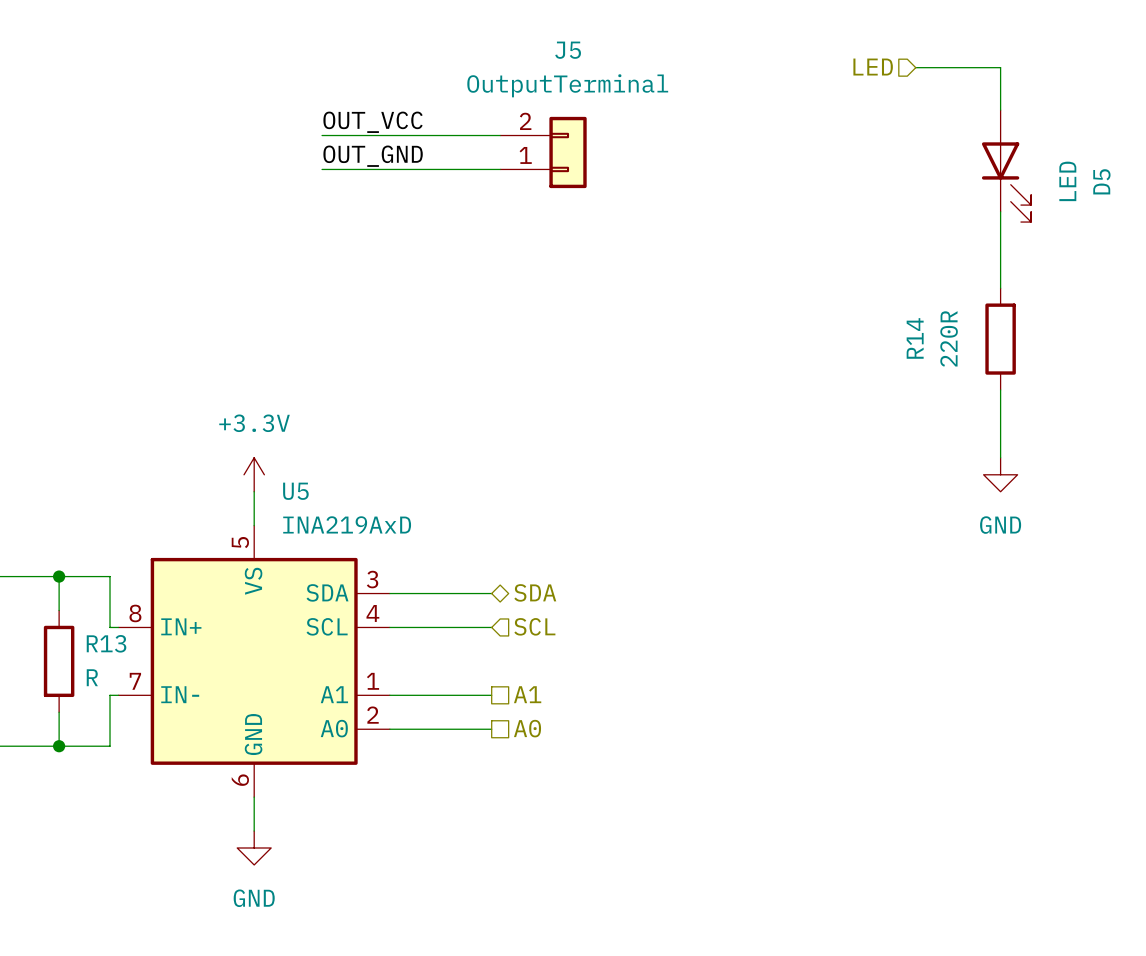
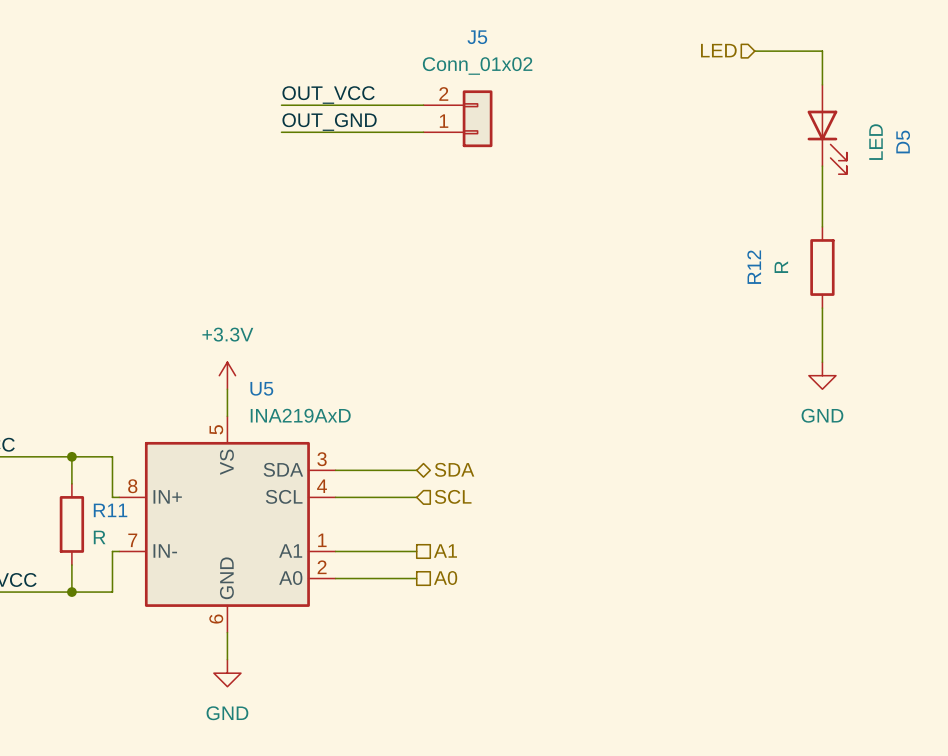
J5 value: OutputTerminal (567, 85) -> Conn_01x02 (477, 66)
R14 name: R14 (915, 338) -> R12 (754, 267)
R14 value: 220R (949, 338) -> R (781, 267)
R13 name: R13 (106, 643) -> R11 (110, 510)

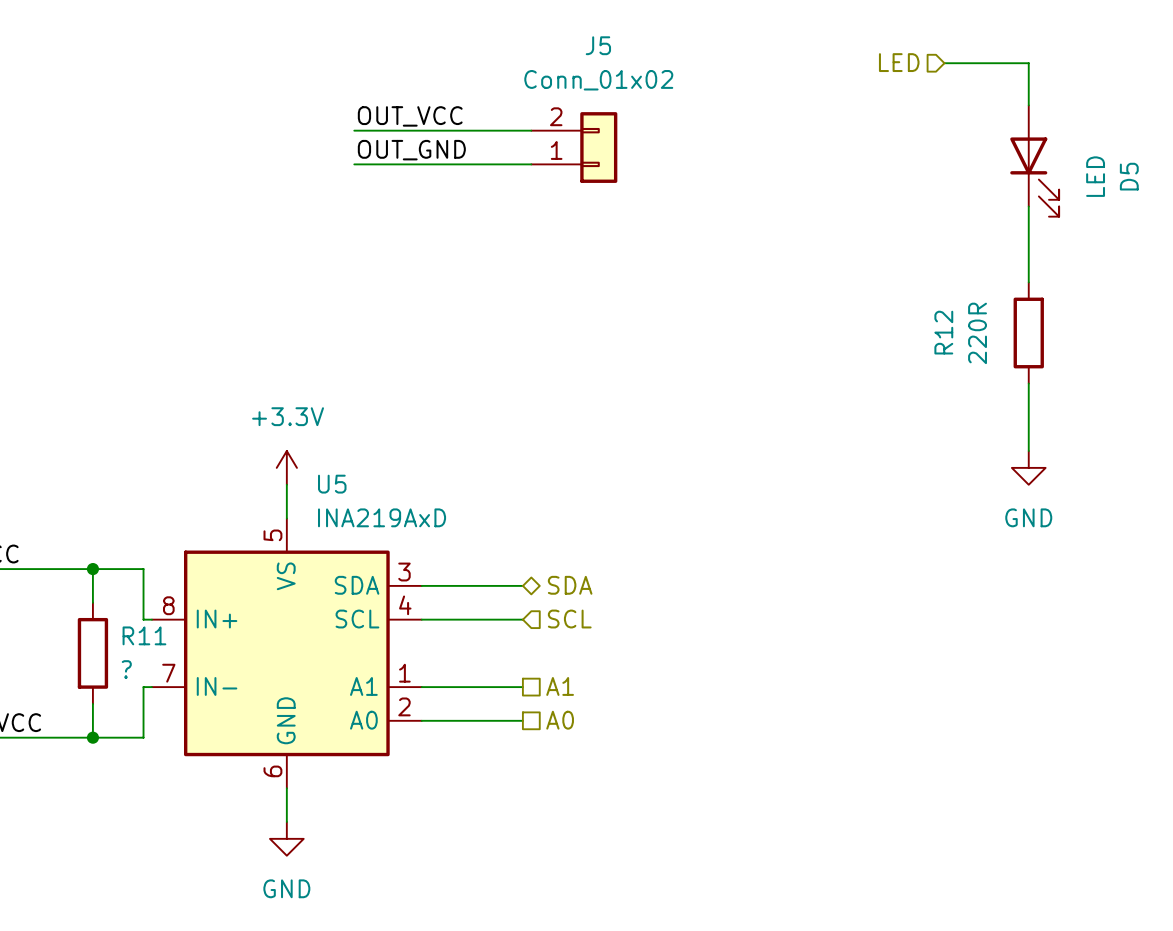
R12 value: R (781, 267) -> 220R (977, 333)
R11 value: R (99, 537) -> ? (126, 669)

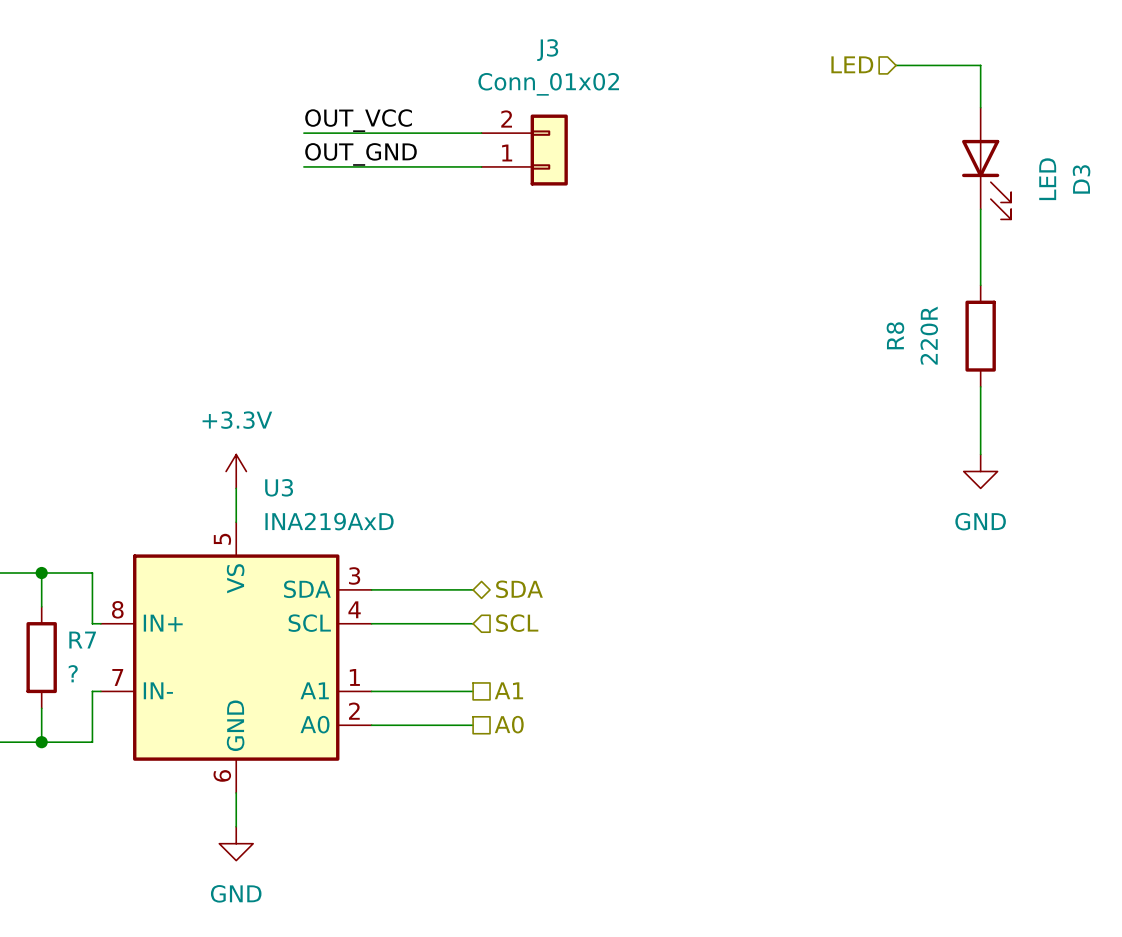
J5 name: J5 (598, 45) -> J3 (547, 50)
D5 name: D5 (1129, 176) -> D3 (1081, 179)
R12 name: R12 (943, 332) -> R8 (895, 335)
U5 name: U5 (332, 484) -> U3 (279, 487)
R11 name: R11 (144, 635) -> R7 (82, 640)

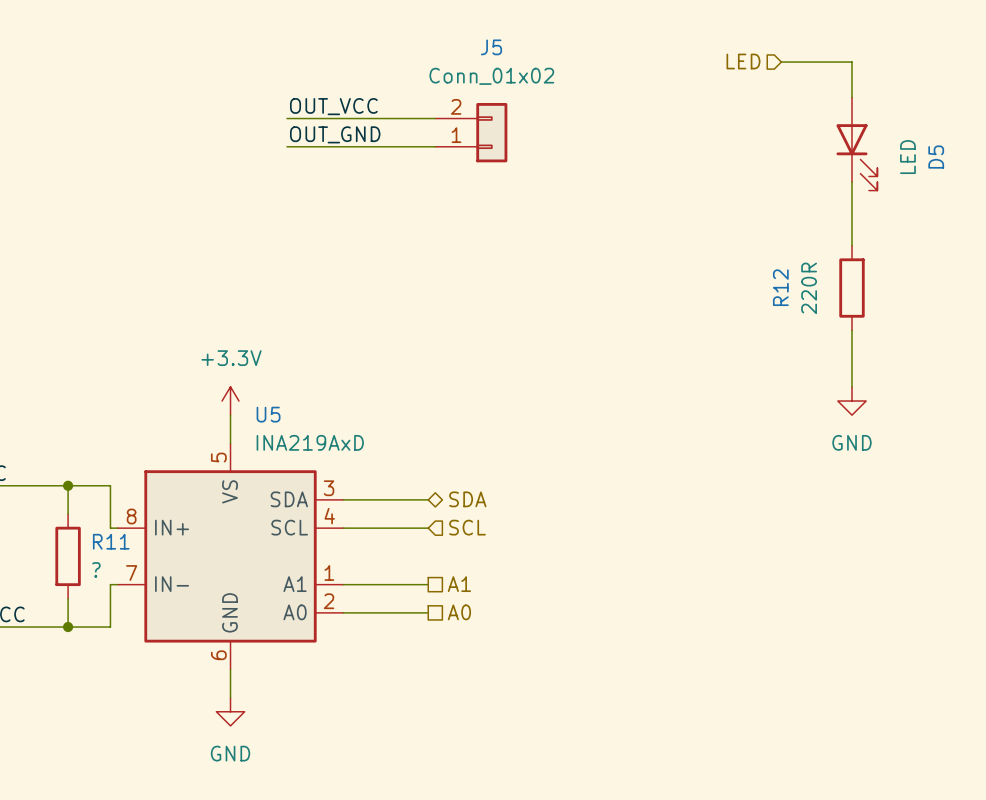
J3 name: J3 (547, 50) -> J5 (491, 47)
D3 name: D3 (1081, 179) -> D5 (936, 157)
R8 name: R8 (895, 335) -> R12 (780, 287)
U3 name: U3 (279, 487) -> U5 (268, 414)
R7 name: R7 (82, 640) -> R11 (111, 541)

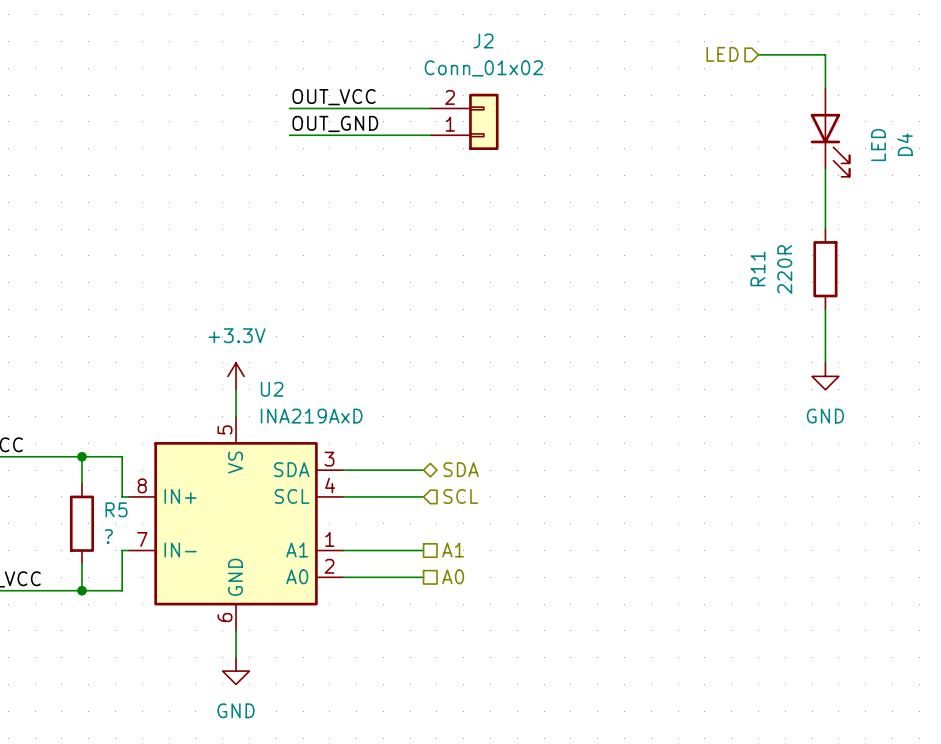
J5 name: J5 (491, 47) -> J2 (483, 40)
D5 name: D5 (936, 157) -> D4 (904, 144)
R12 name: R12 (780, 287) -> R11 (757, 268)
U5 name: U5 (268, 414) -> U2 (272, 389)
R11 name: R11 (111, 541) -> R5 (116, 509)

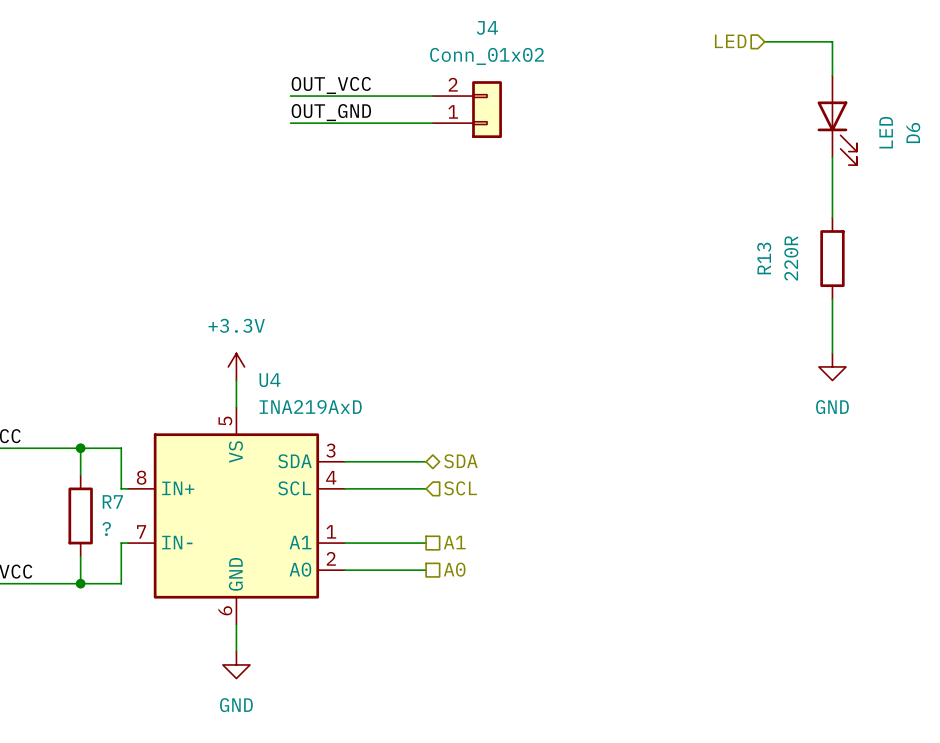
J2 name: J2 (483, 40) -> J4 (487, 27)
D4 name: D4 (904, 144) -> D6 (913, 132)
R11 name: R11 (757, 268) -> R13 (764, 258)
U2 name: U2 (272, 389) -> U4 (270, 380)
R5 name: R5 (116, 509) -> R7 (112, 501)

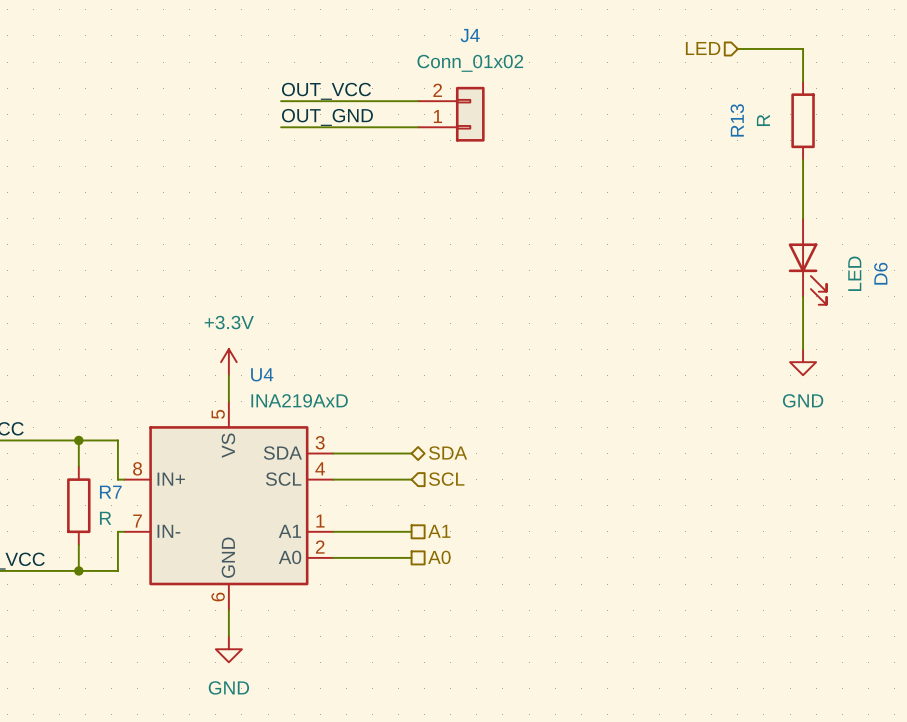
D6 position: (837, 120) -> (807, 261)
R13 value: 220R (791, 258) -> R (763, 120)
R13 position: (832, 258) -> (803, 120)
R7 value: ? (106, 528) -> R (105, 518)

